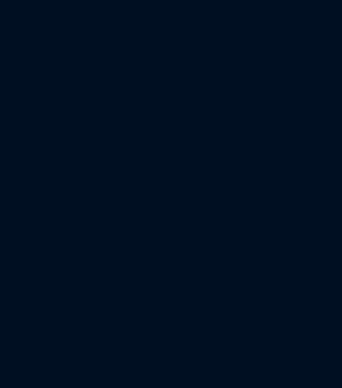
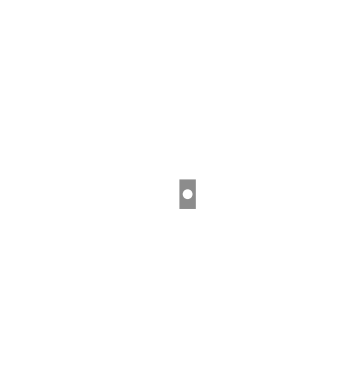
part: none -> (187, 194)

